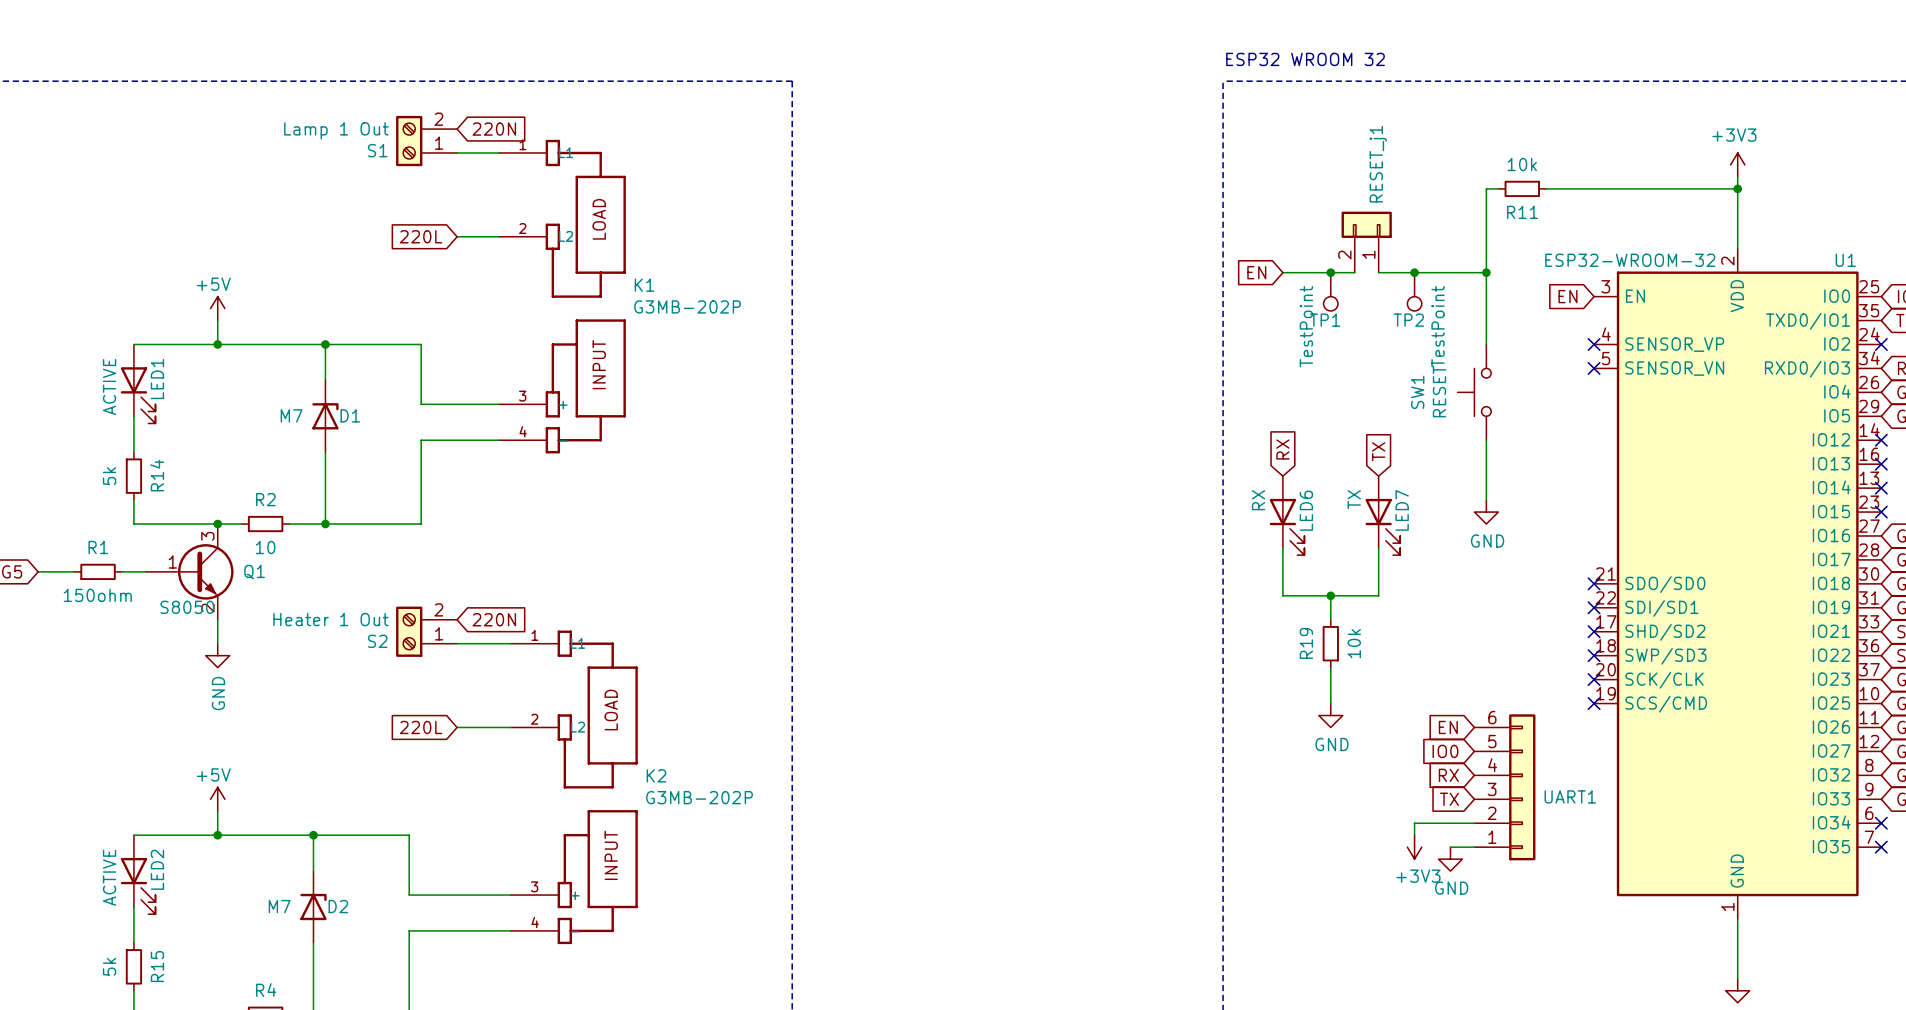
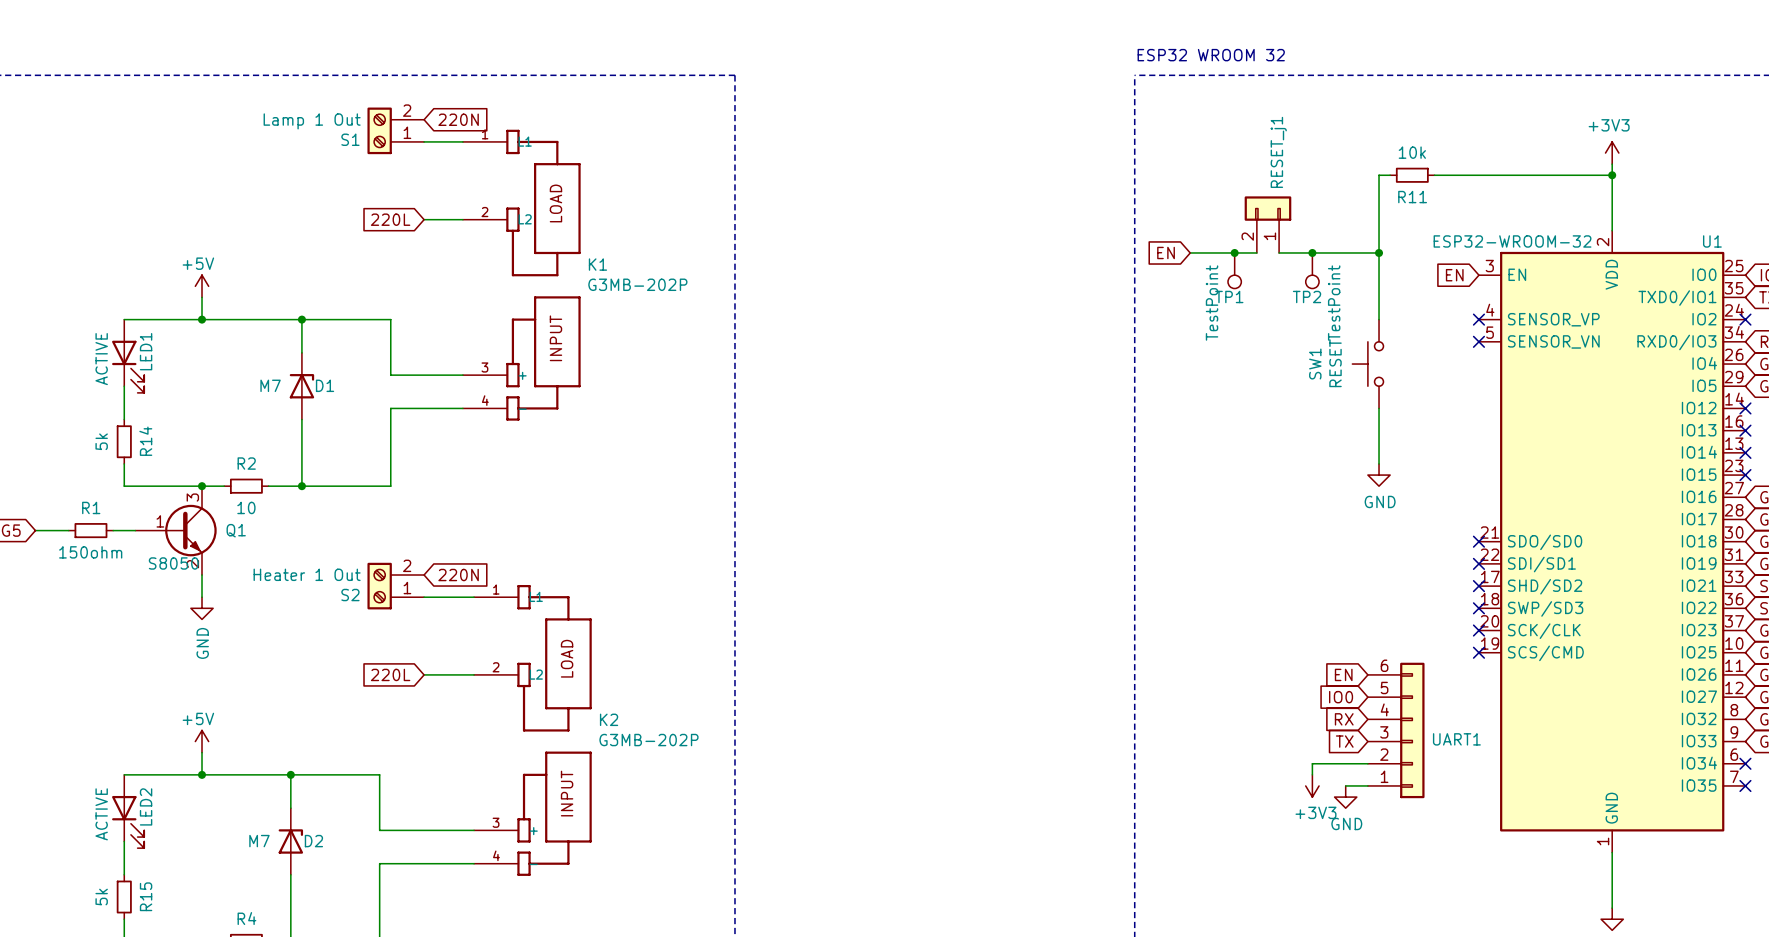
global label: RX (1282, 449) -> none
global label: TX (1378, 451) -> none
LED6: RX (1287, 515) -> none
LED7: TX (1382, 515) -> none
wire: (1282, 547) (1282, 595) (1378, 595) (1378, 547) -> none
wire: (1330, 595) (1330, 619) -> none
junction: (1330, 595) -> none
R19: 10k (1330, 643) -> none
wire: (1330, 667) (1330, 703) -> none
power symbol: GND (1330, 715) -> none

